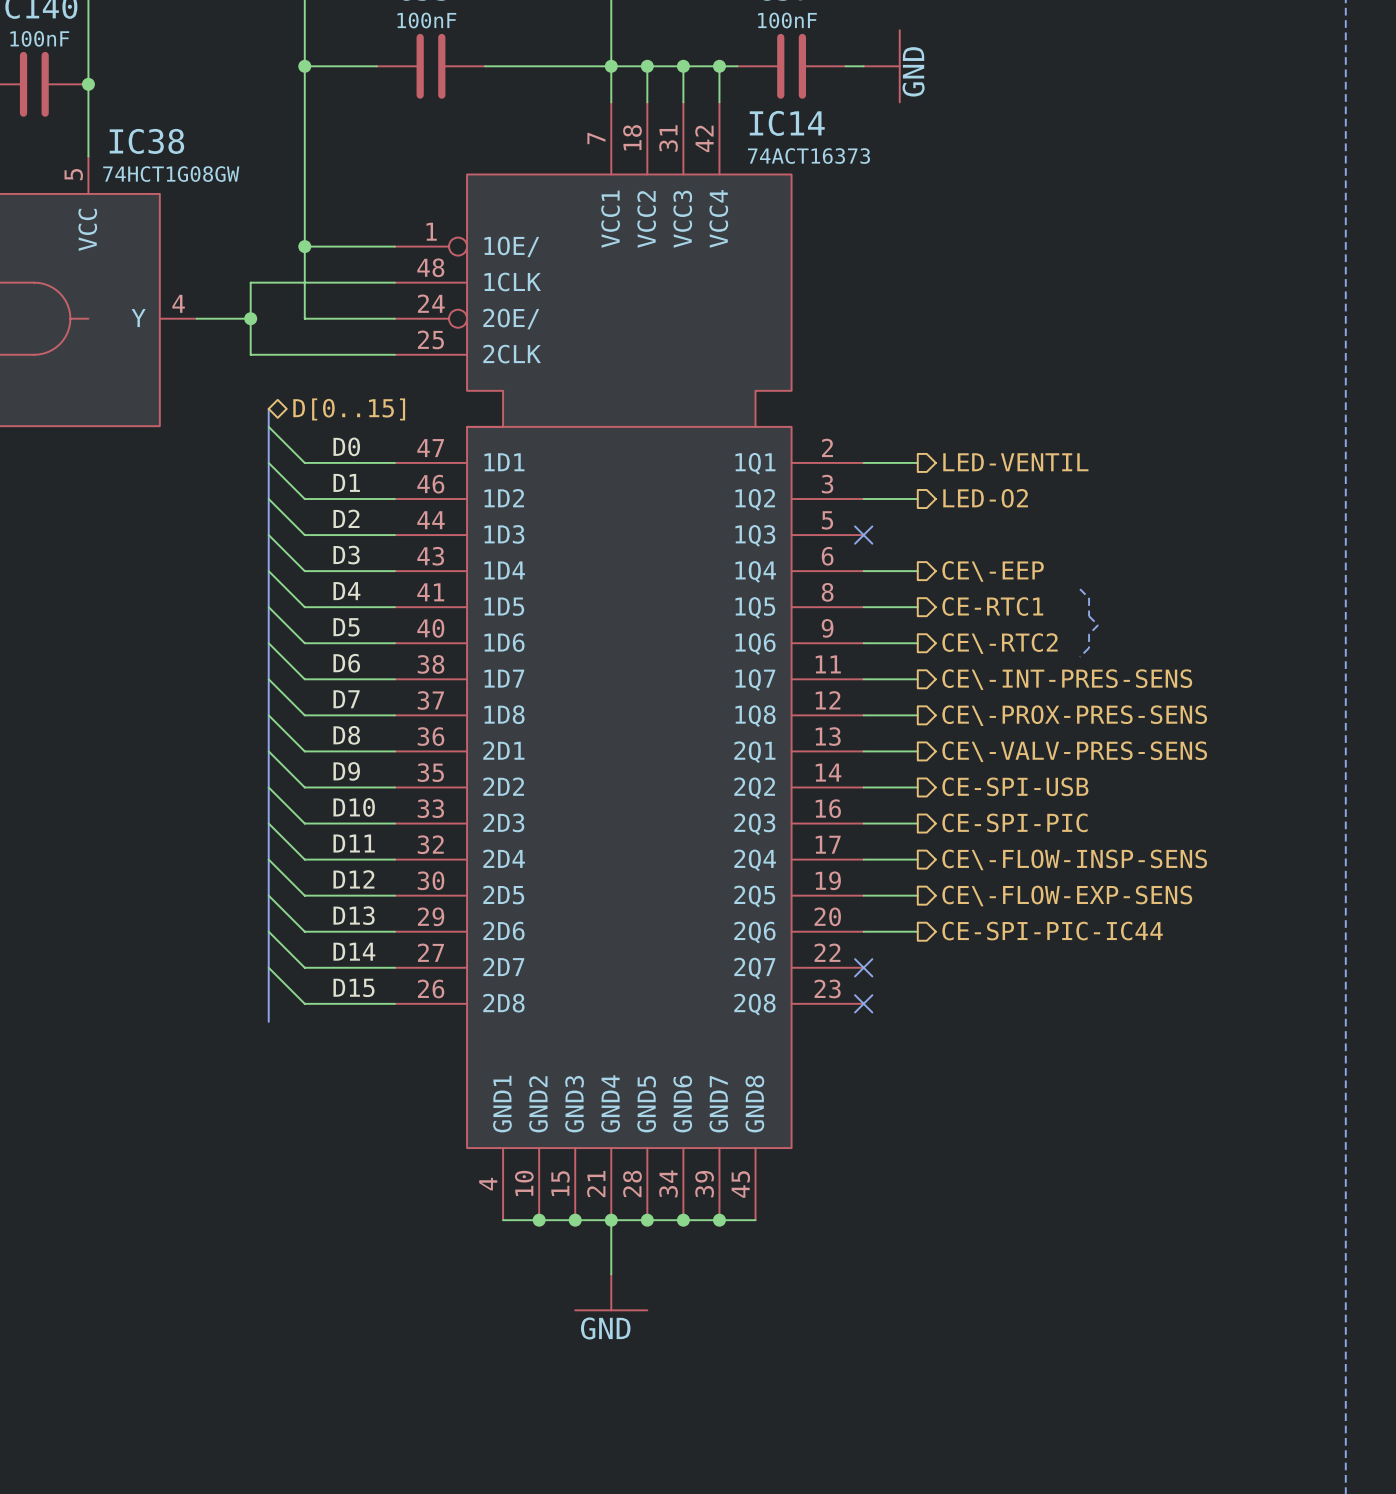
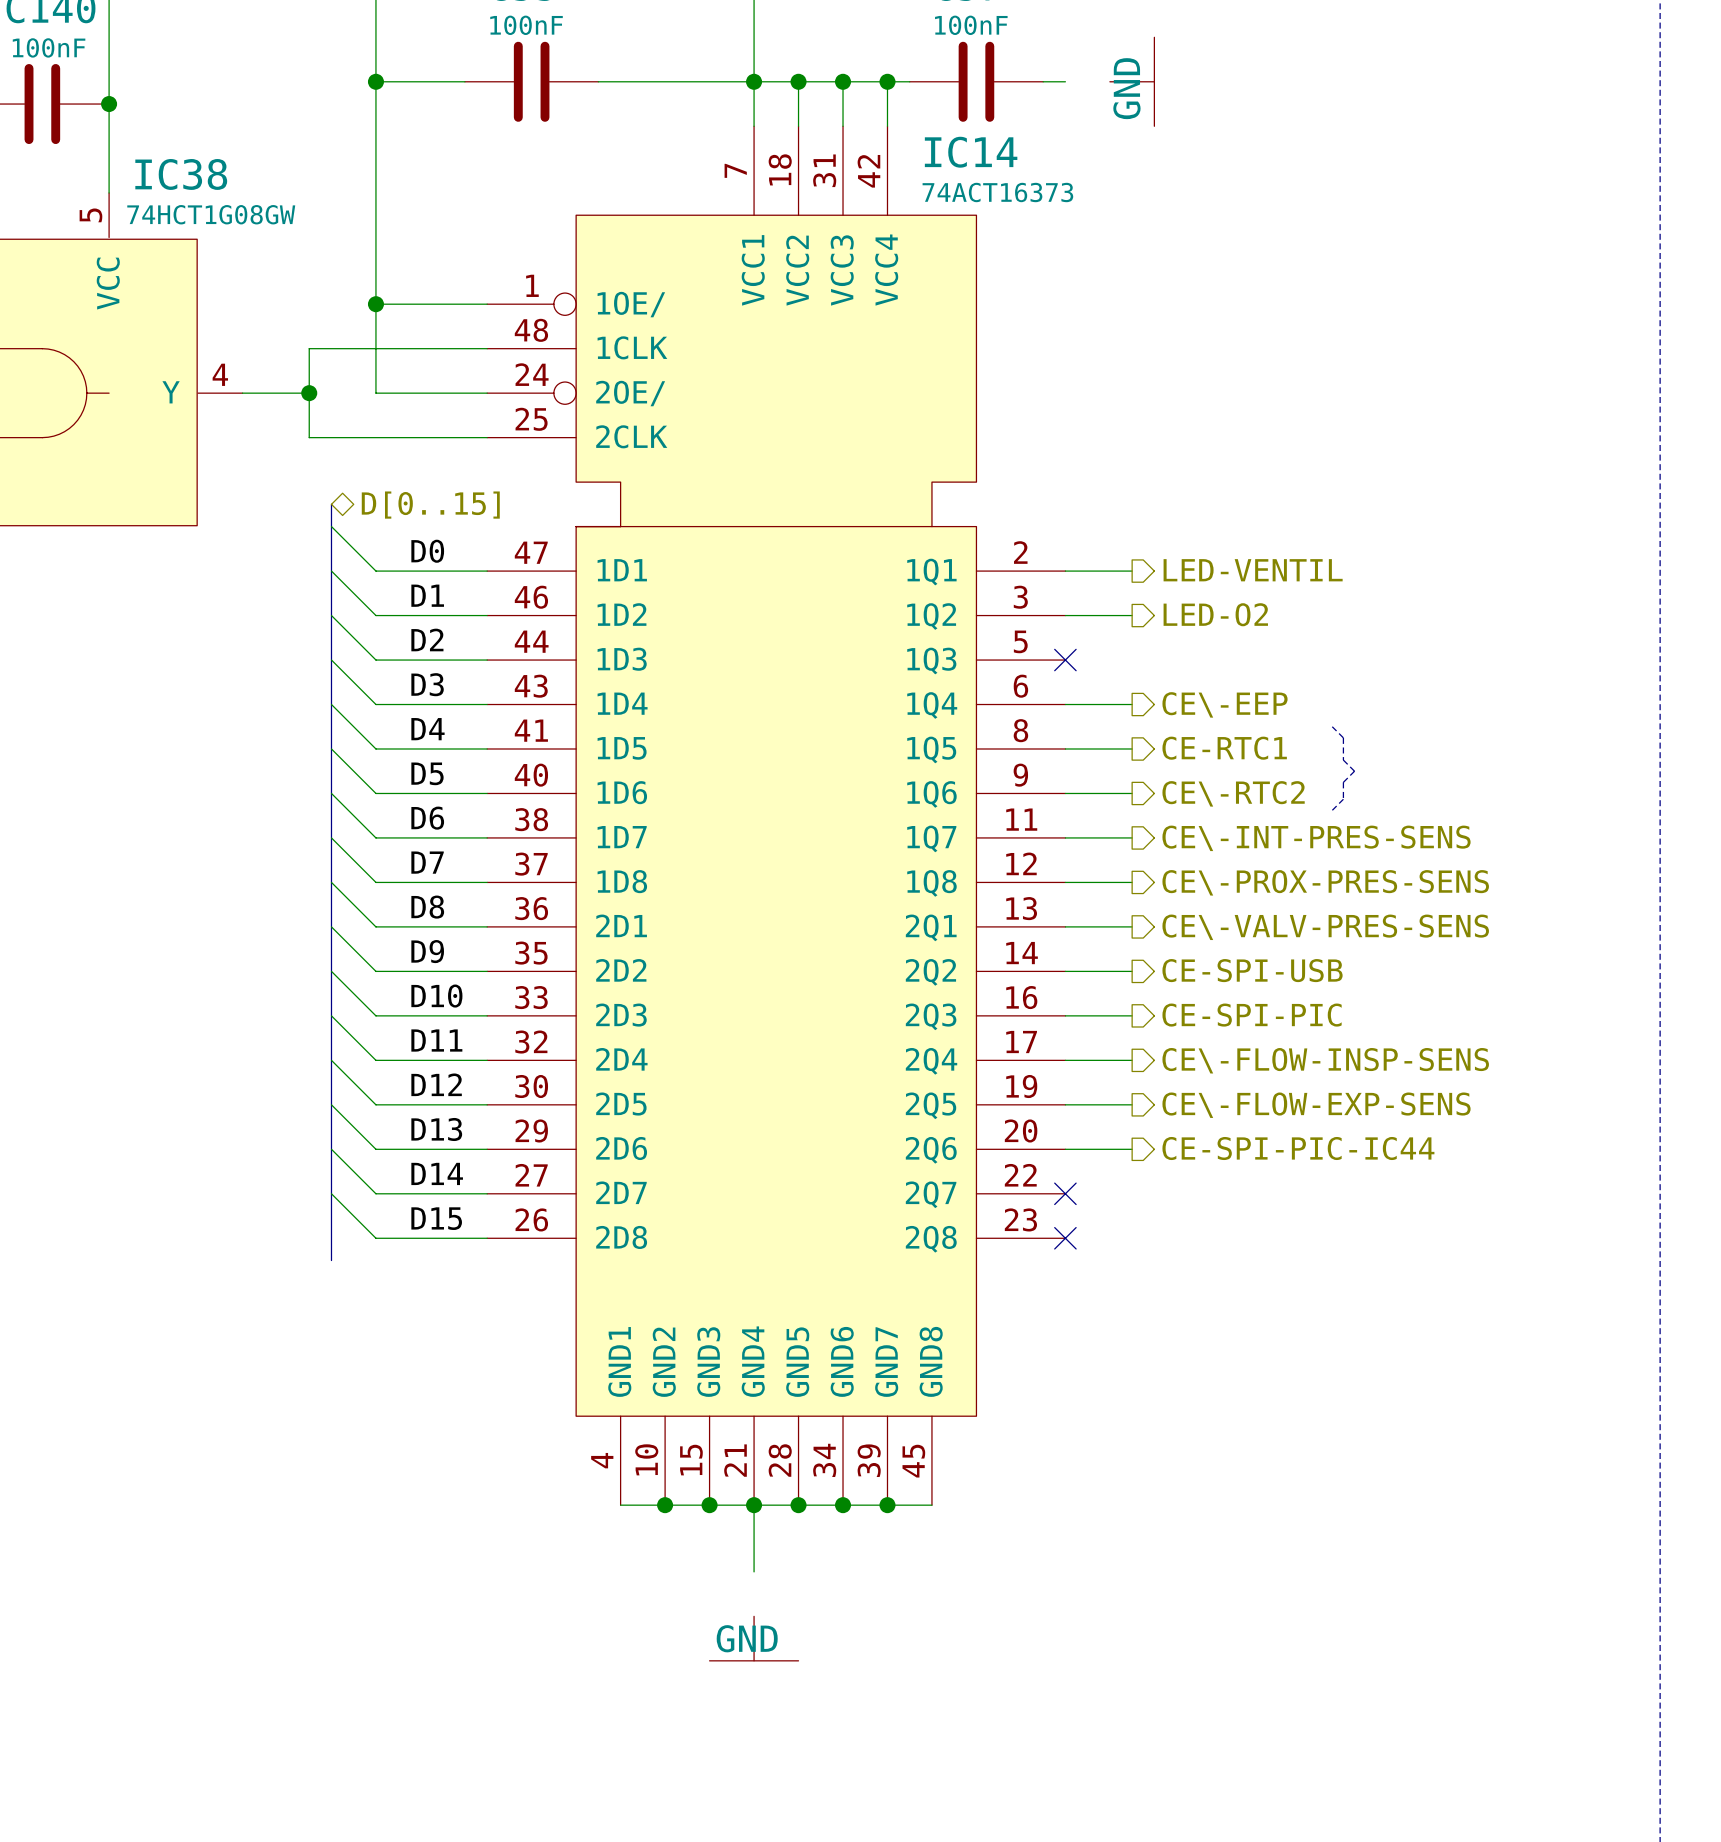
power symbol position: GND (881, 66) -> GND (1132, 81)
power symbol position: GND (611, 1292) -> GND (754, 1638)

